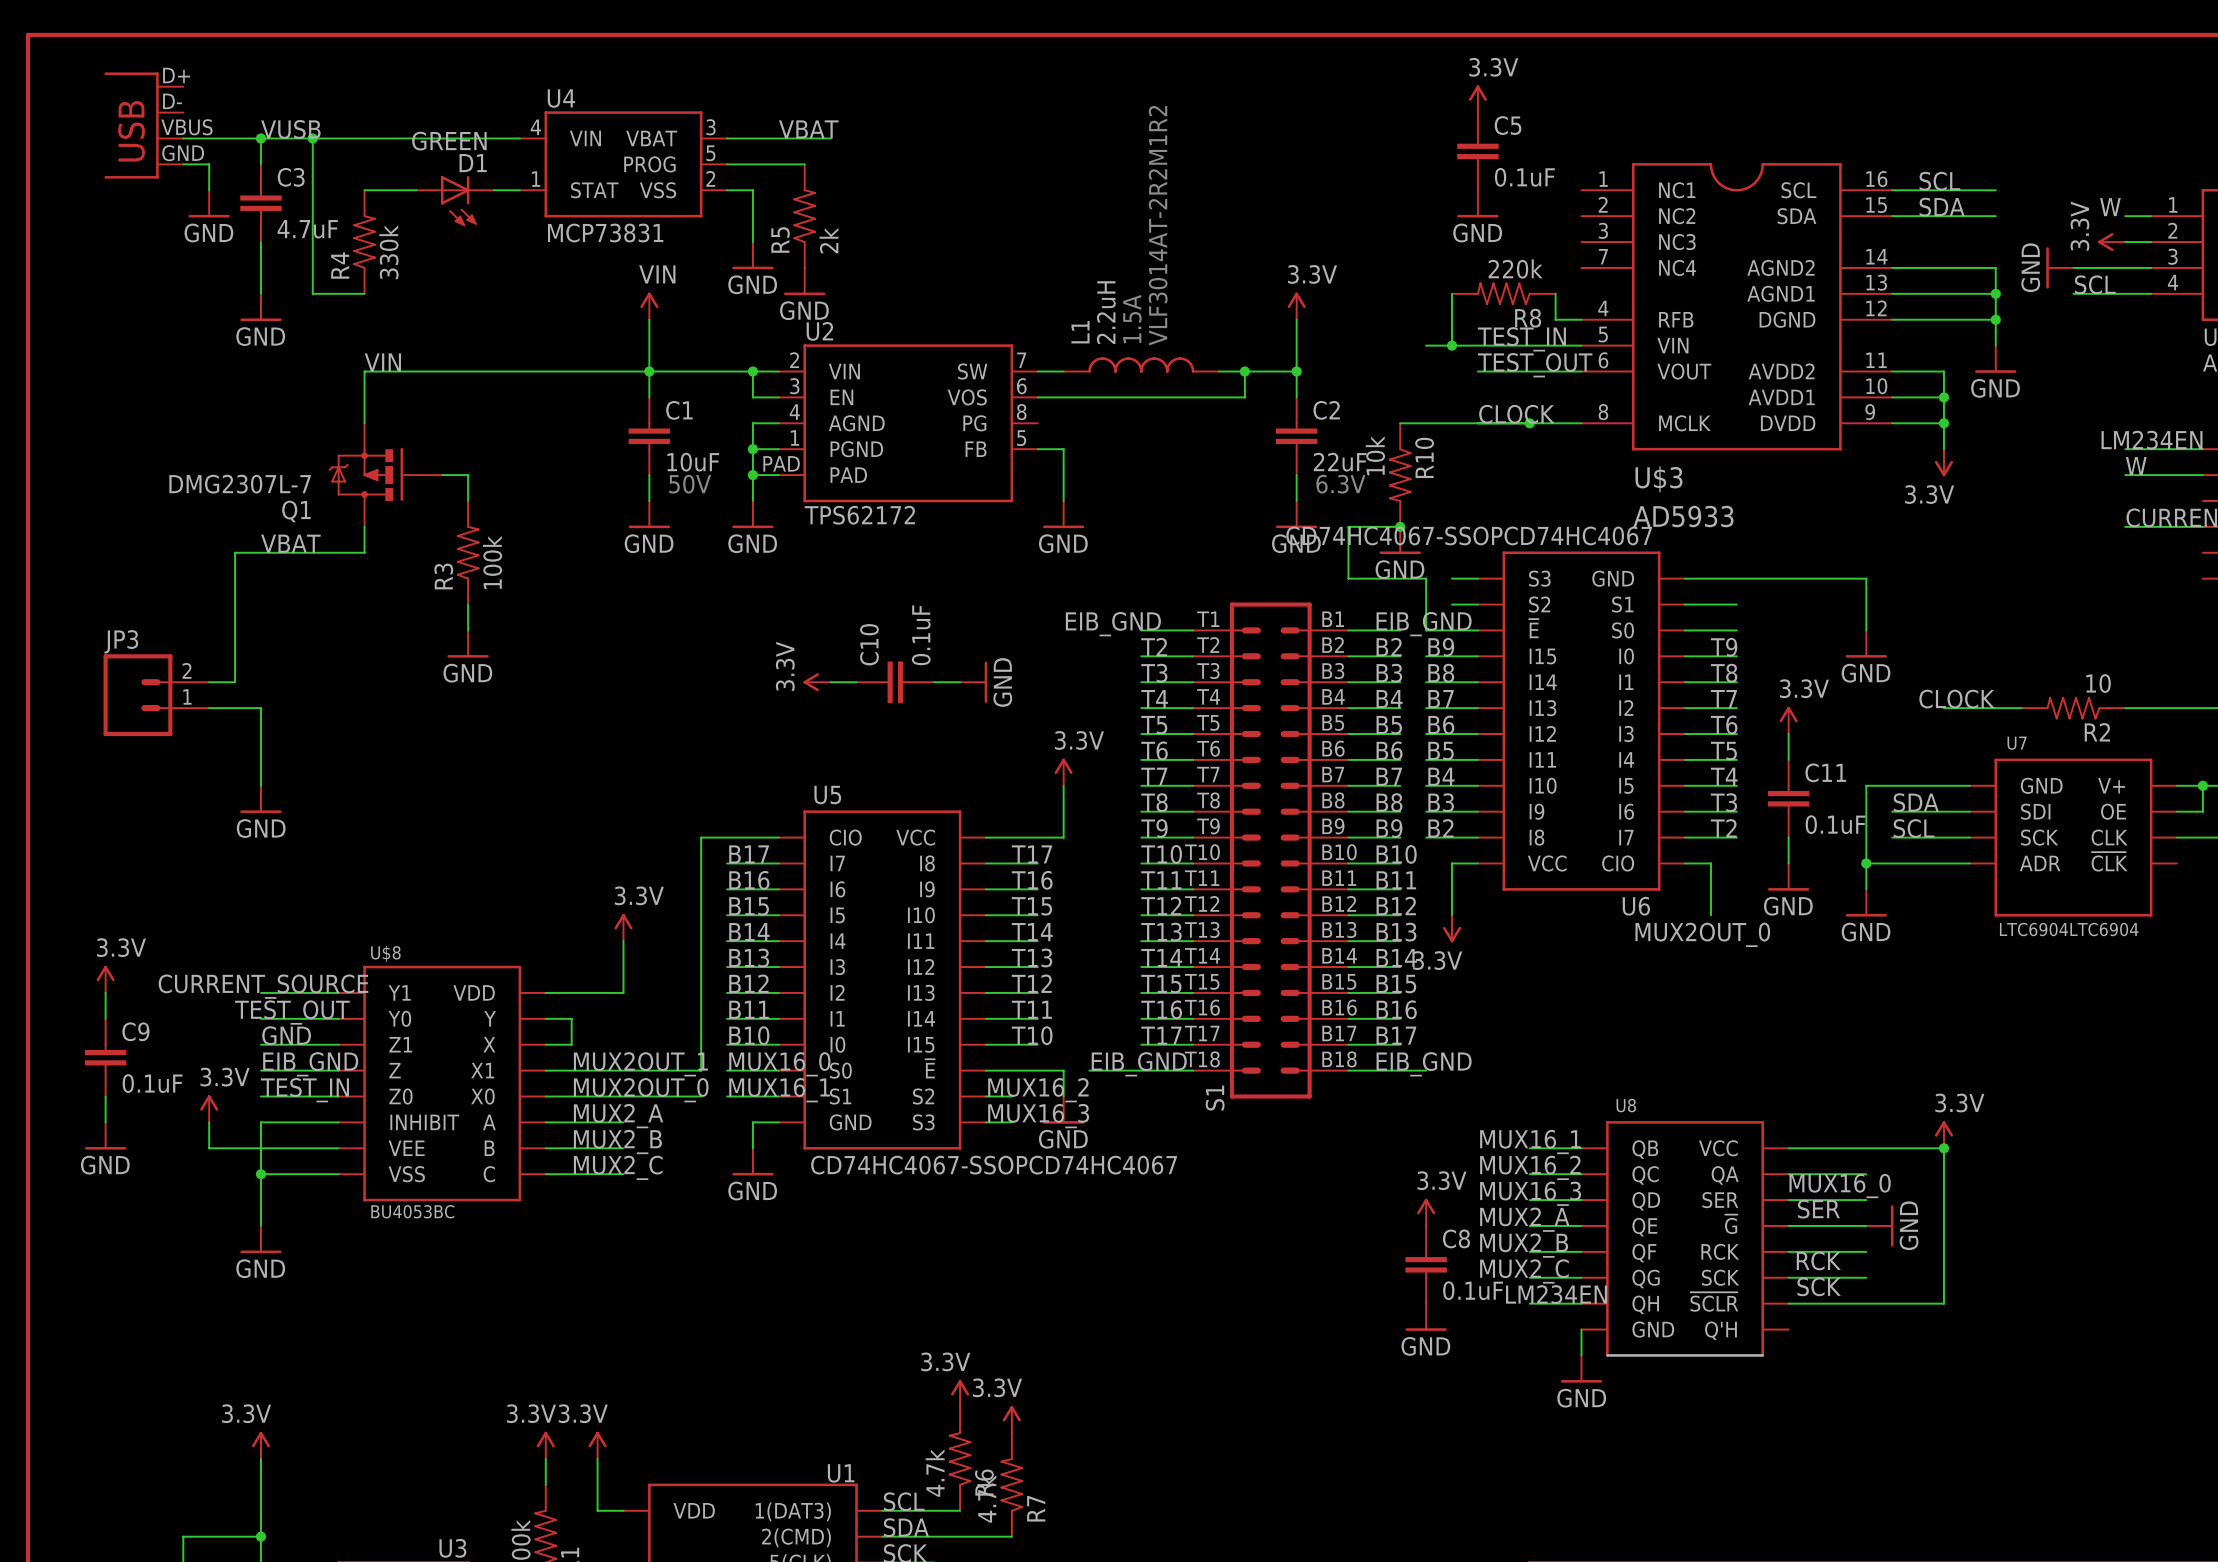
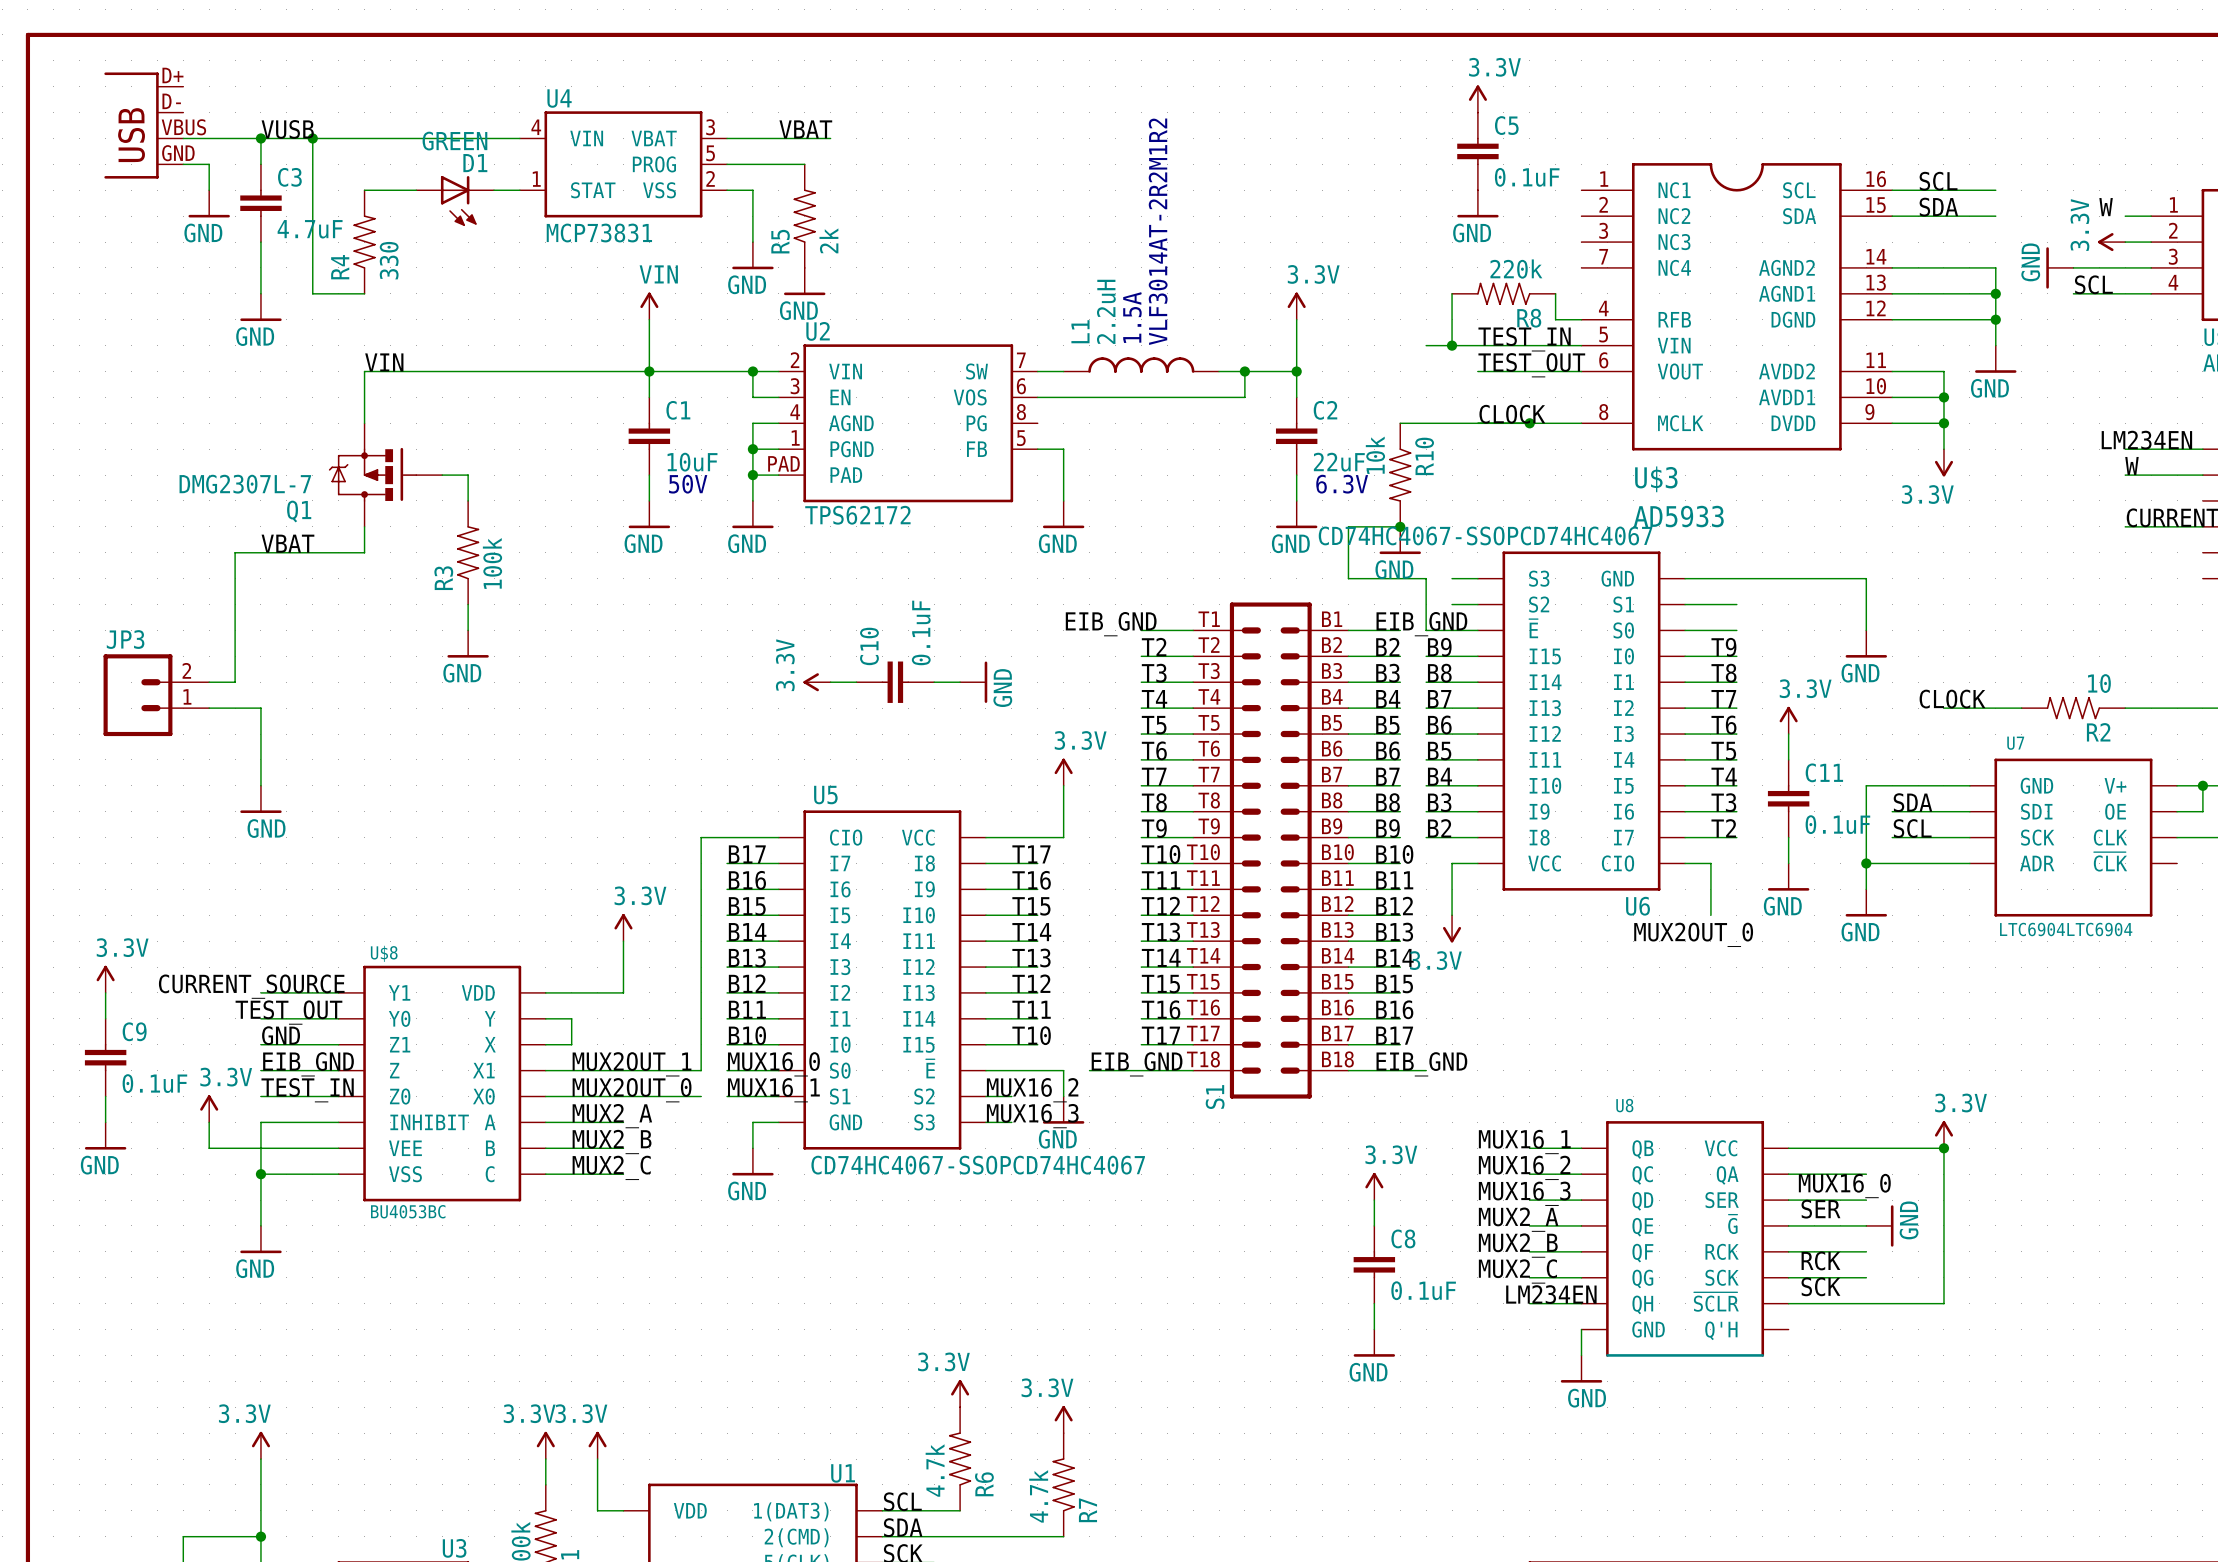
R4 value: 330k (388, 252) -> 330 (389, 260)
wire: none -> (1374, 1200) (1374, 1225)
power symbol position: 3.3V (1426, 1212) -> 3.3V (1374, 1186)
C8 position: (1426, 1264) -> (1374, 1264)
wire: none -> (1374, 1303) (1374, 1329)
power symbol position: GND (1426, 1317) -> GND (1374, 1343)
power symbol position: 3.3V (1011, 1419) -> 3.3V (1063, 1419)
R7 position: (1011, 1484) -> (1063, 1484)
wire: none -> (1011, 1536) (1063, 1536)

